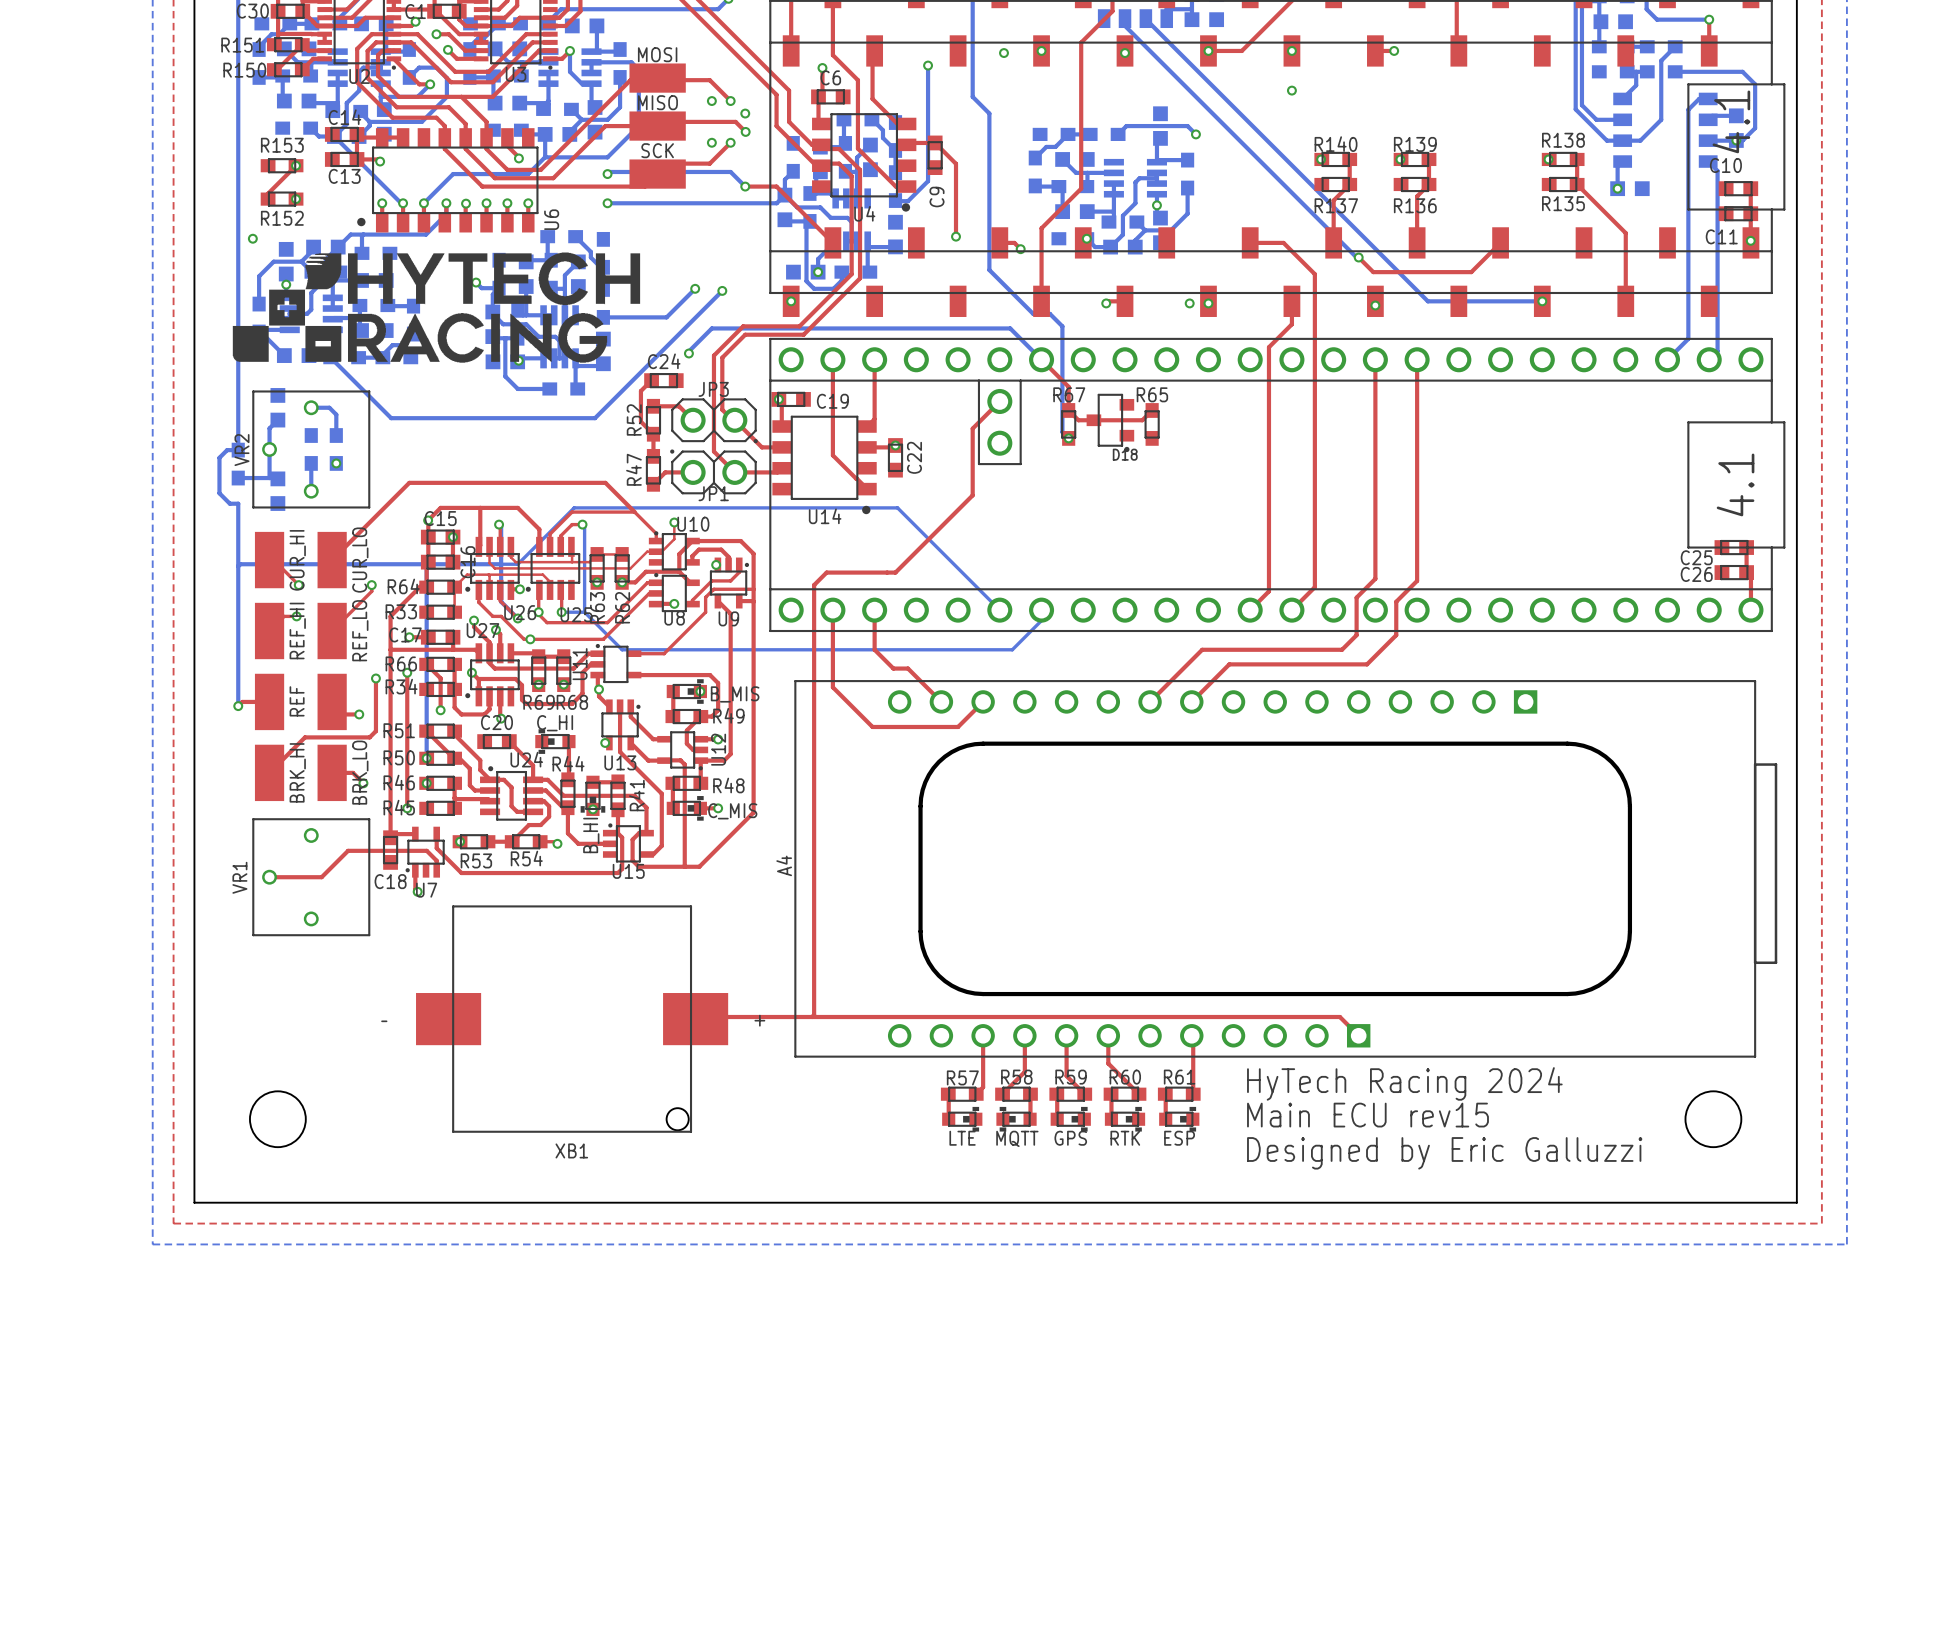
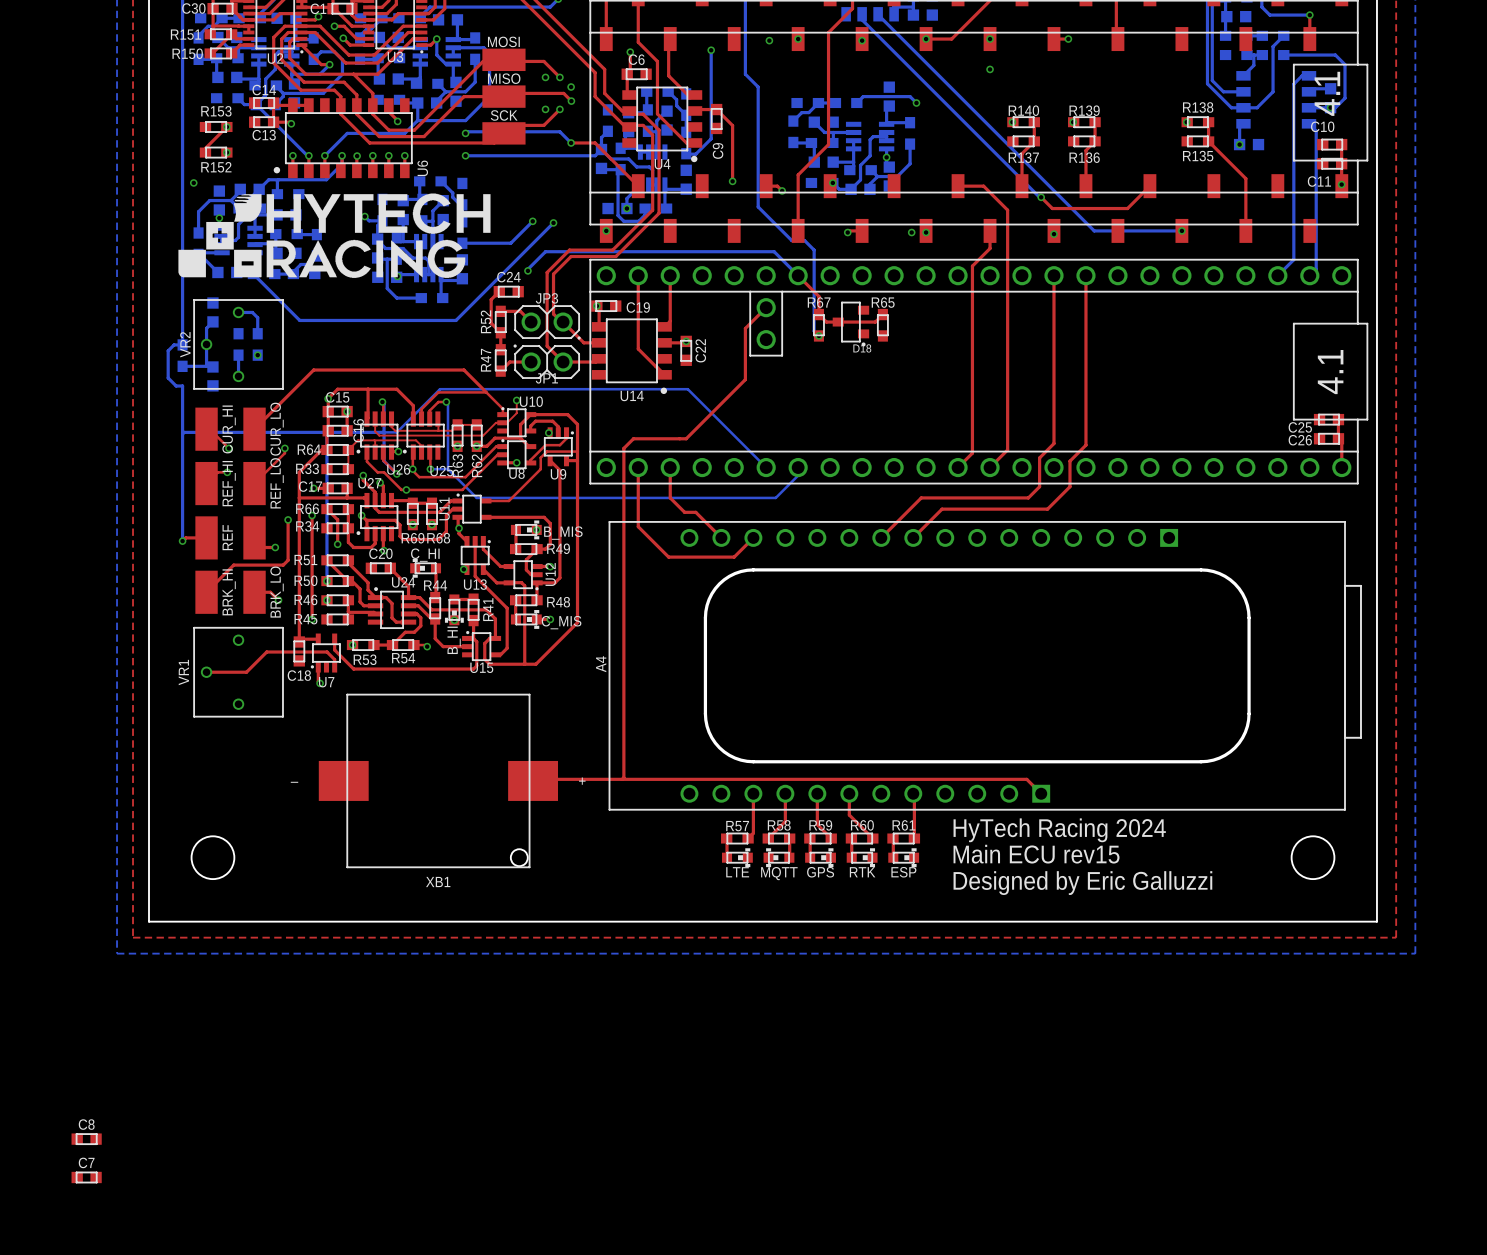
C8: none -> (86, 1139)
C7: none -> (86, 1177)

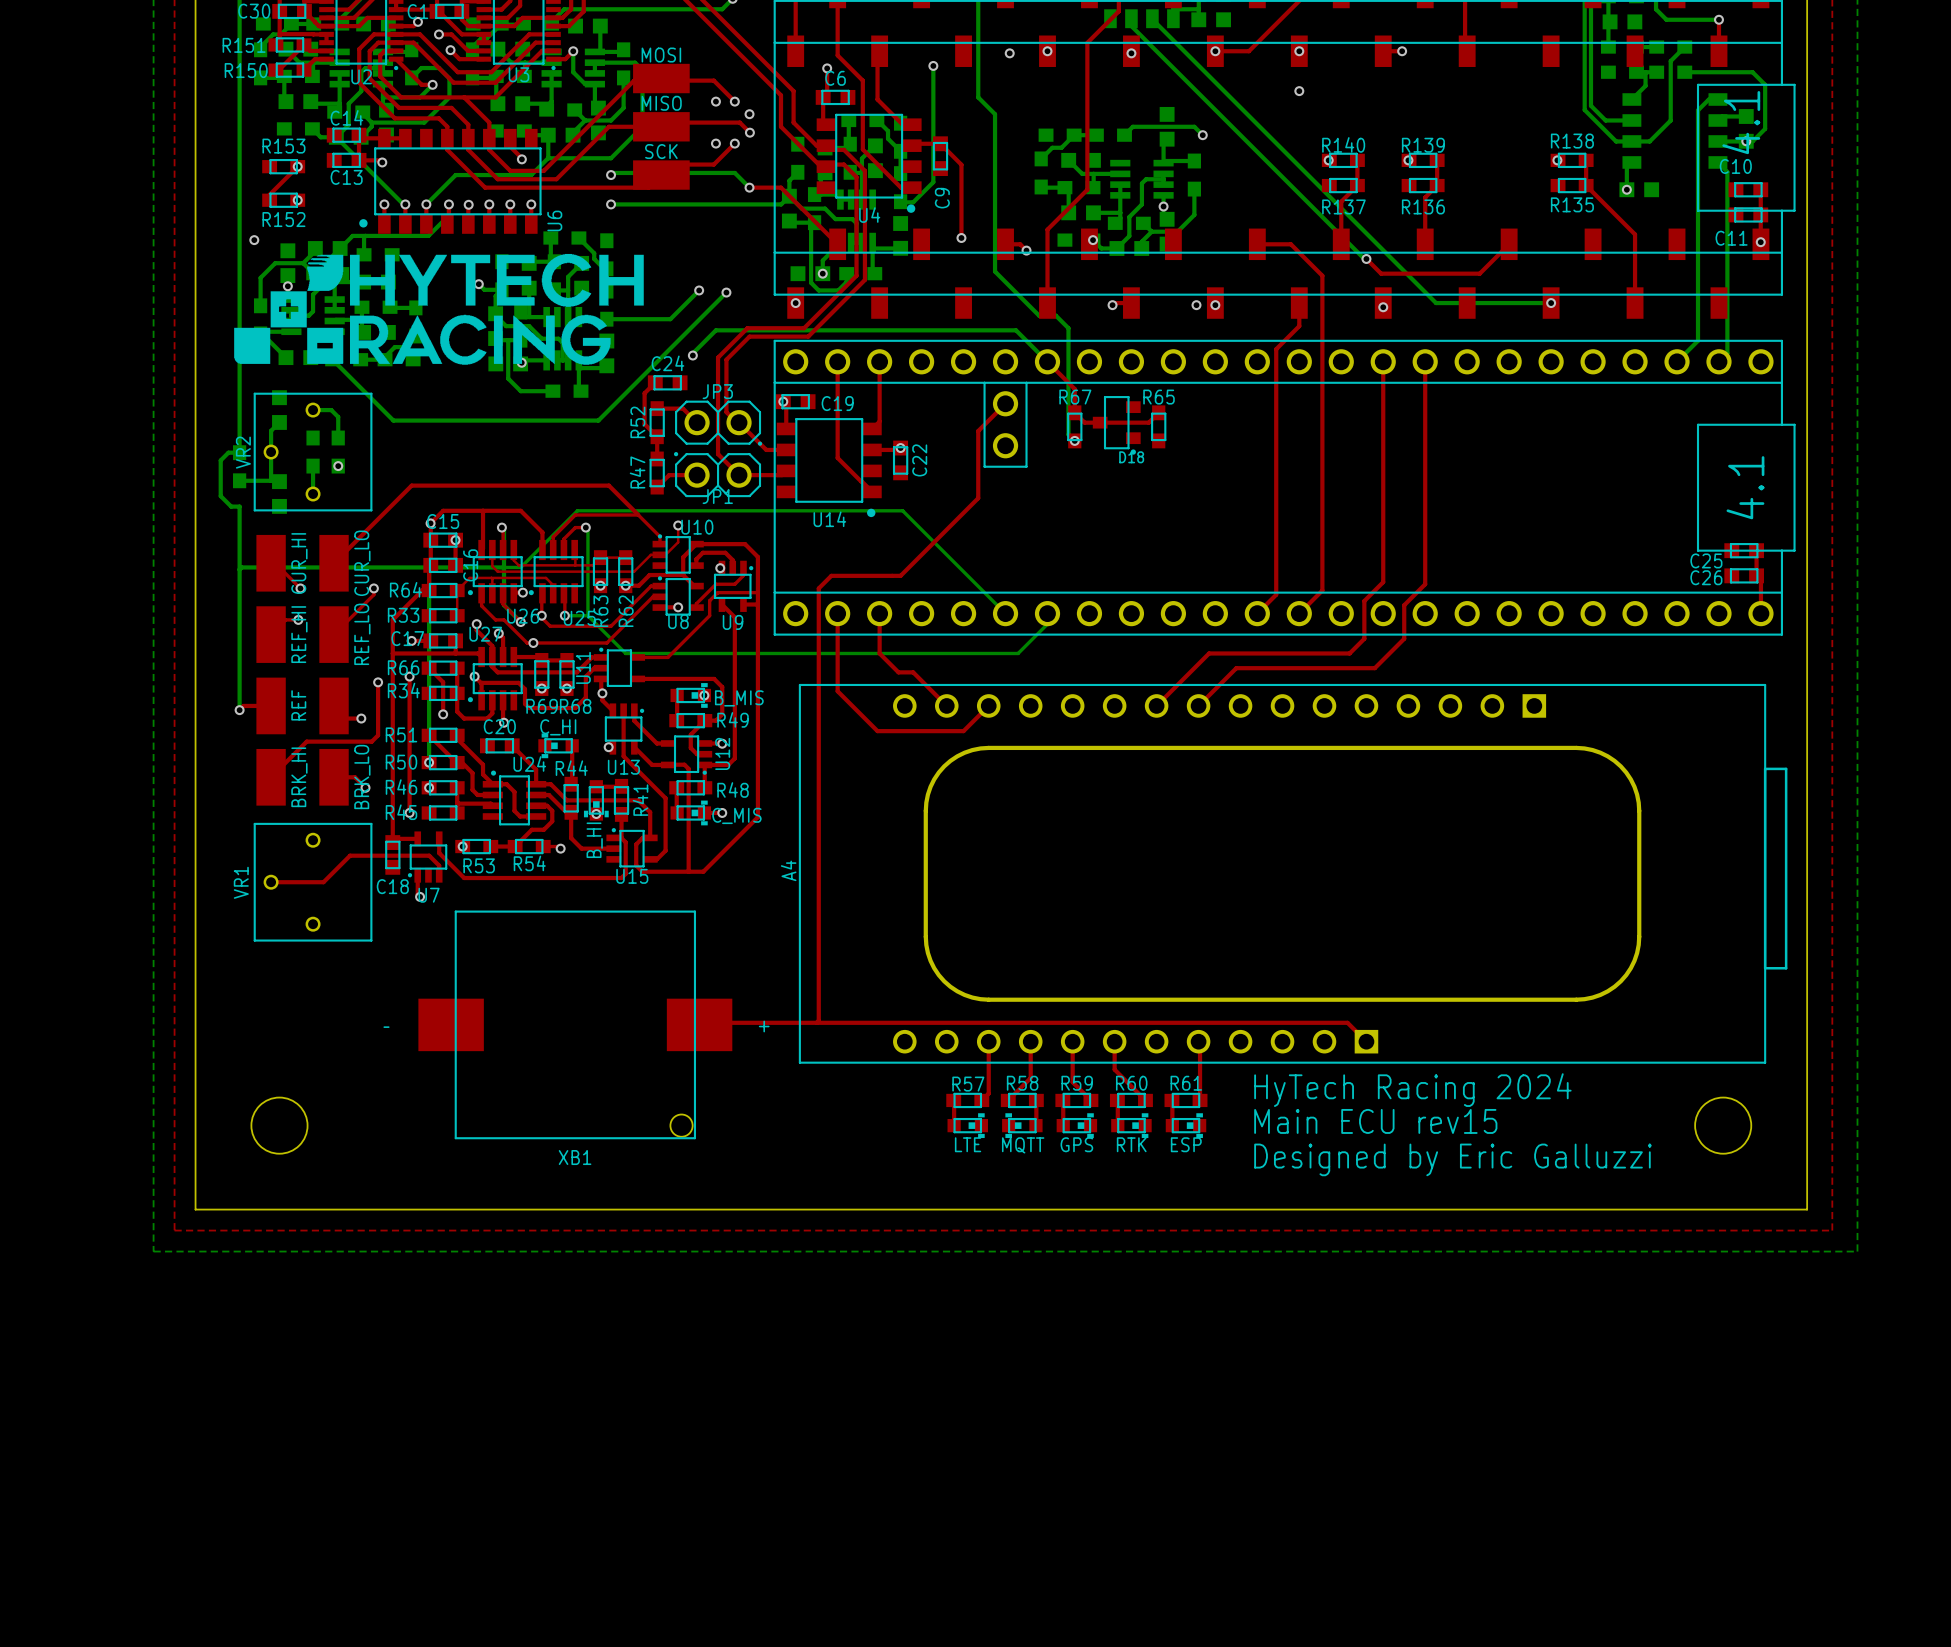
C8: (86, 1139) -> none
C7: (86, 1177) -> none

